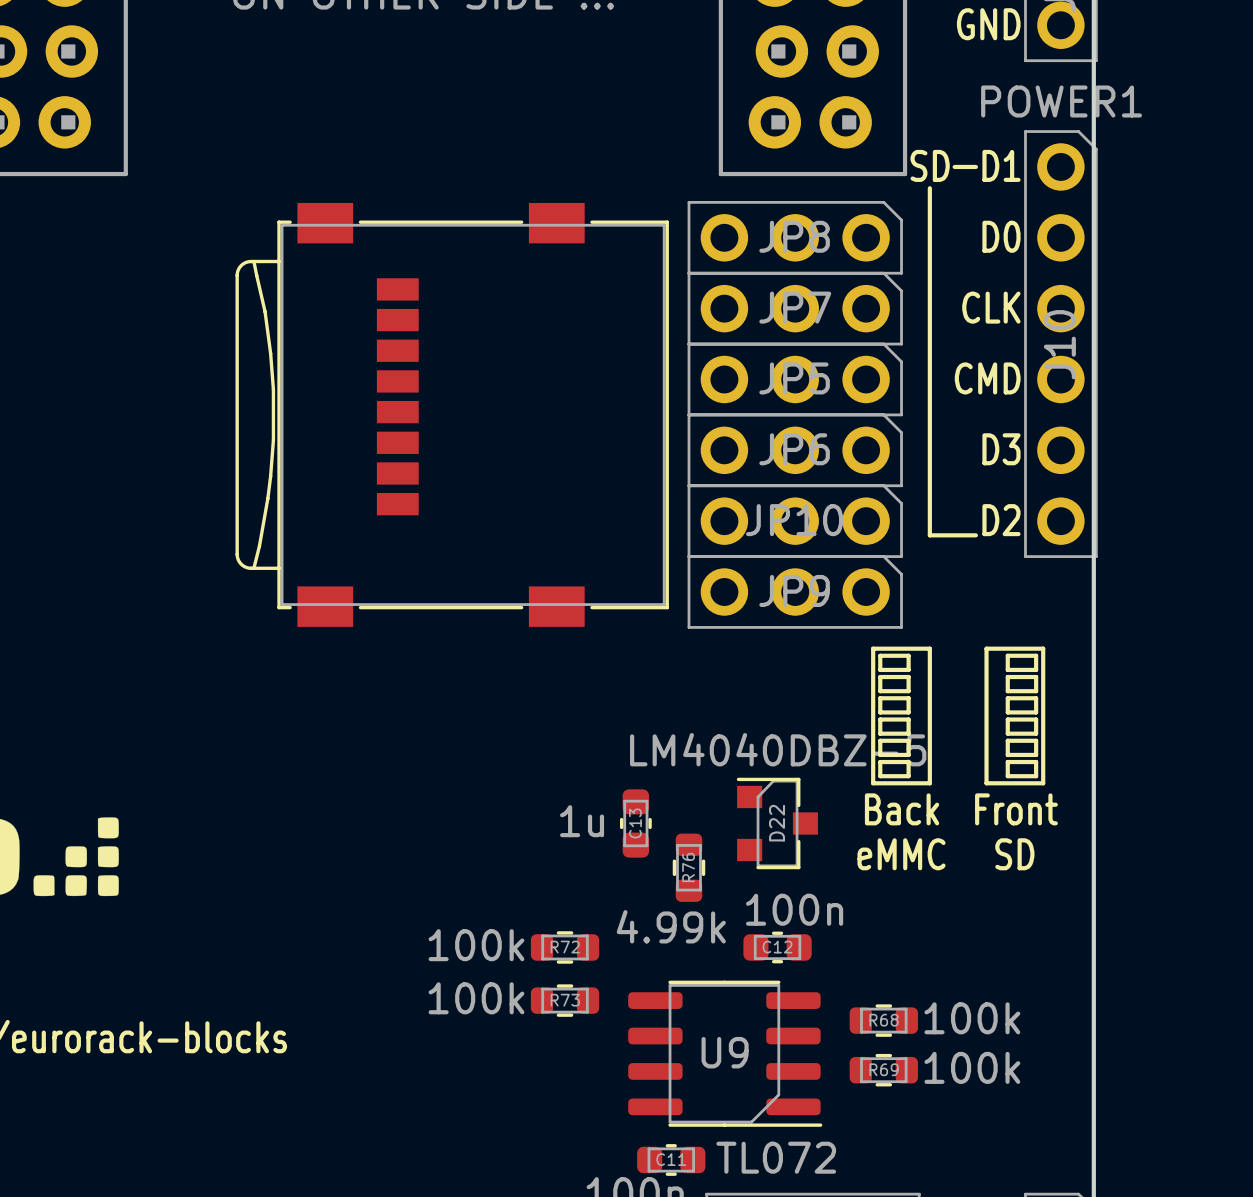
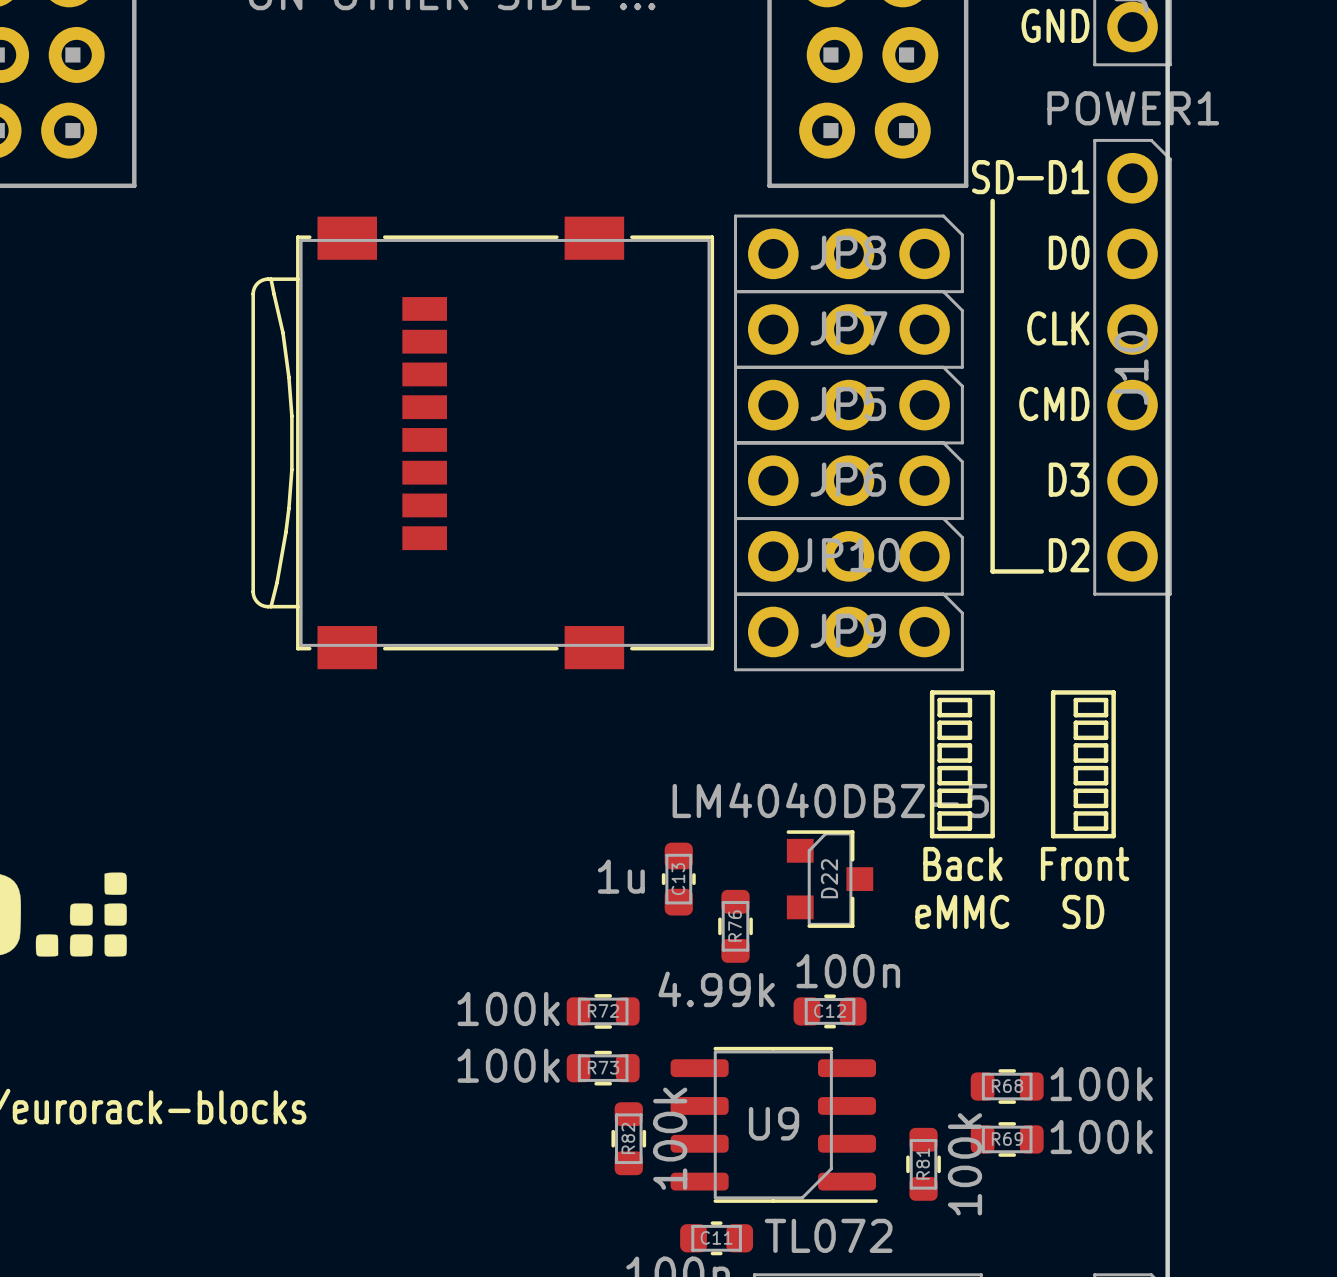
R68 position: (883, 1020) -> (1007, 1086)
R82: none -> 100k (628, 1138)
R69 position: (883, 1070) -> (1007, 1139)
R81: none -> 100k (923, 1164)

